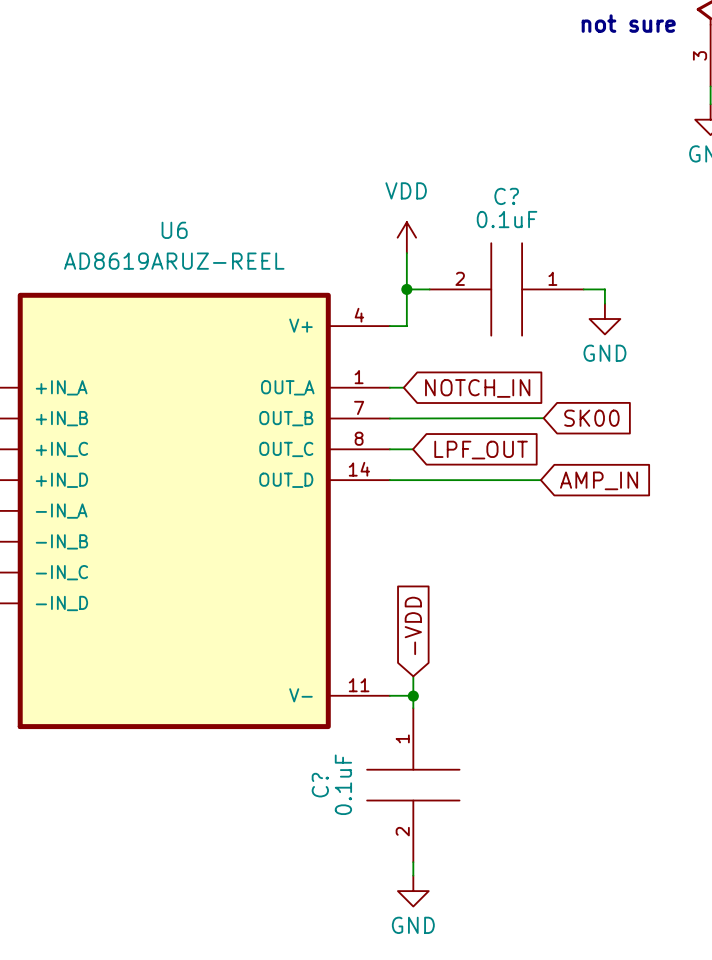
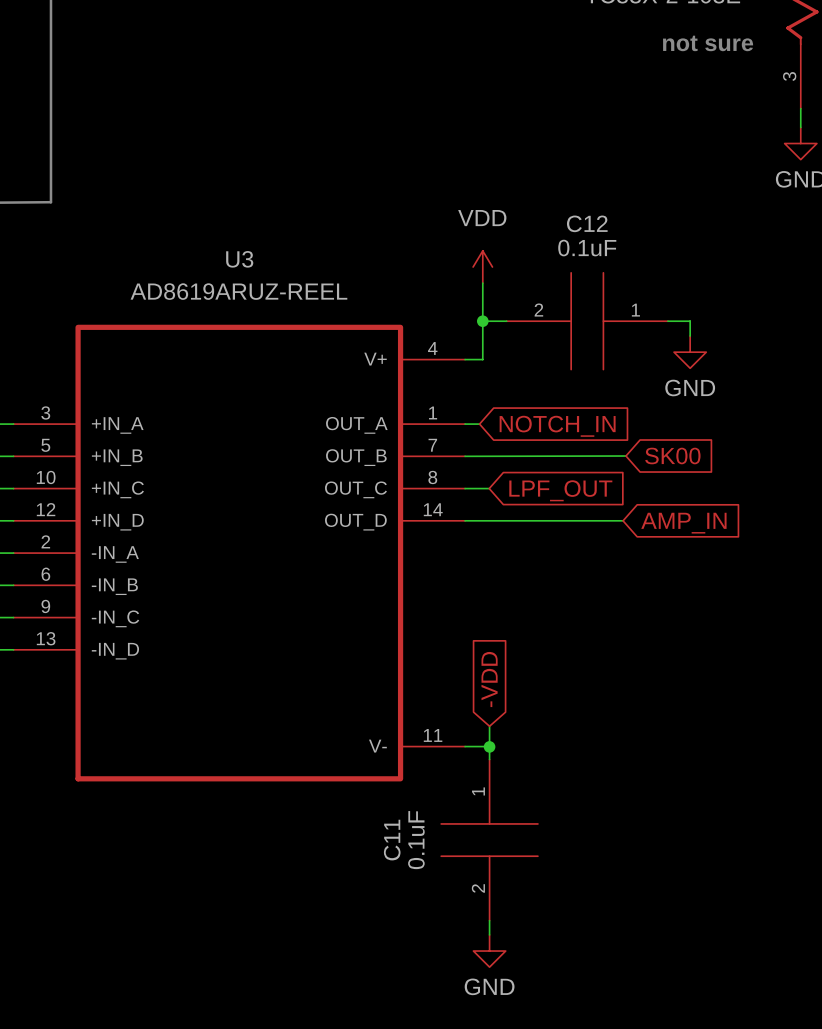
C? name: C? (506, 196) -> C12 (587, 223)
U6 name: U6 (174, 230) -> U3 (239, 259)
C? name: C? (320, 785) -> C11 (392, 840)

